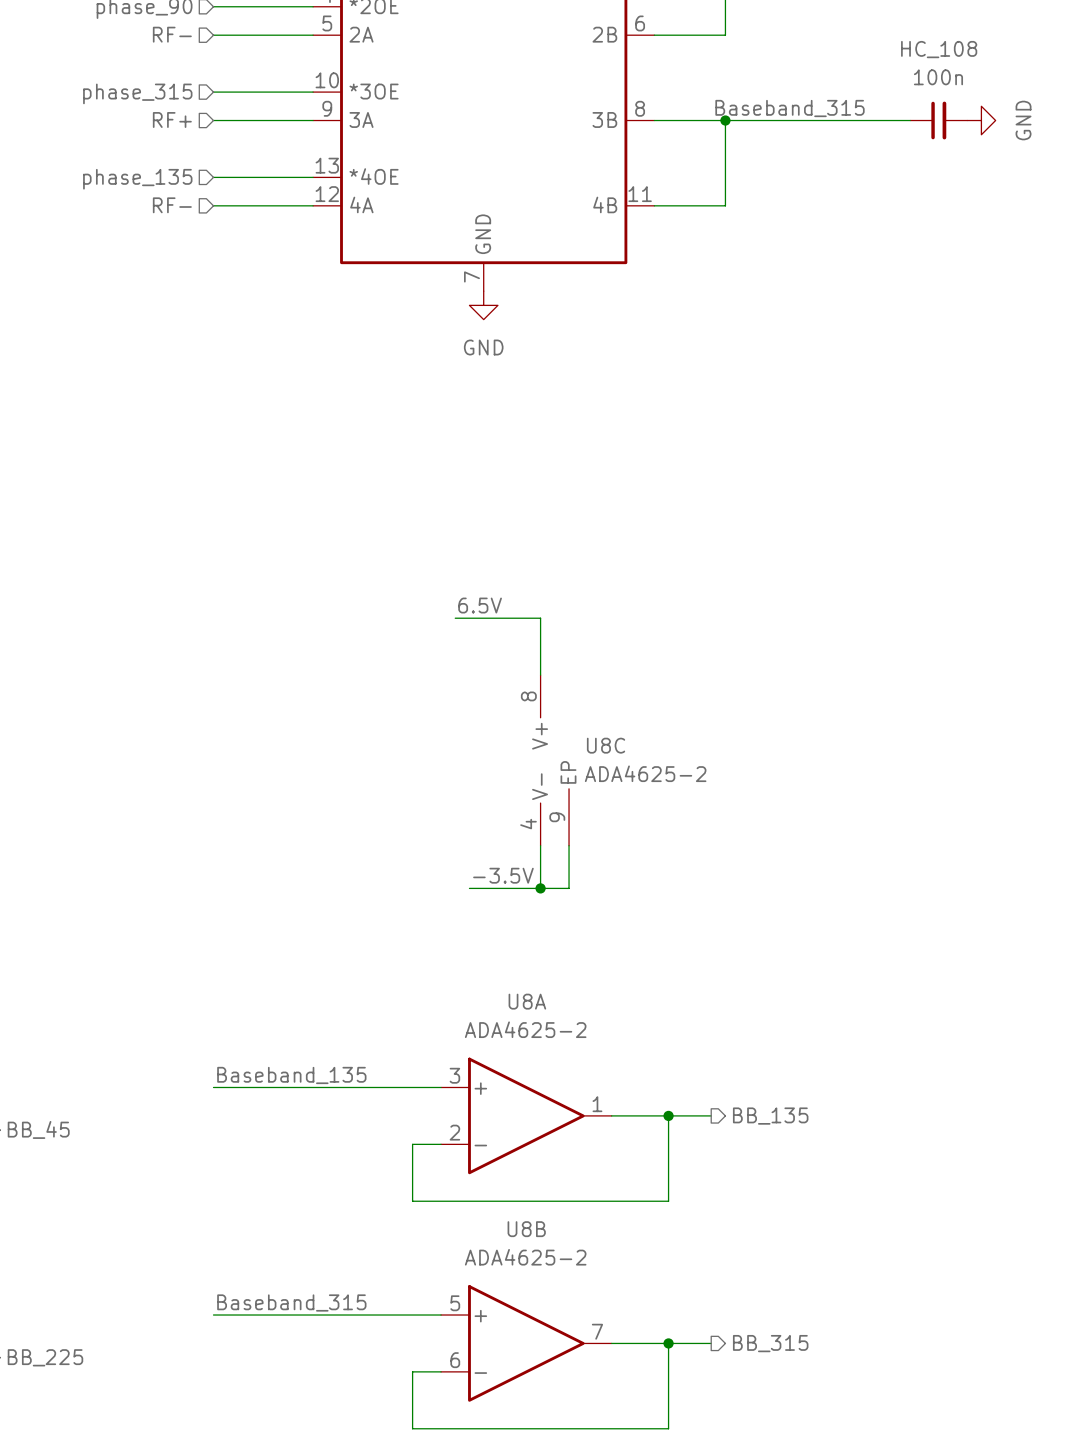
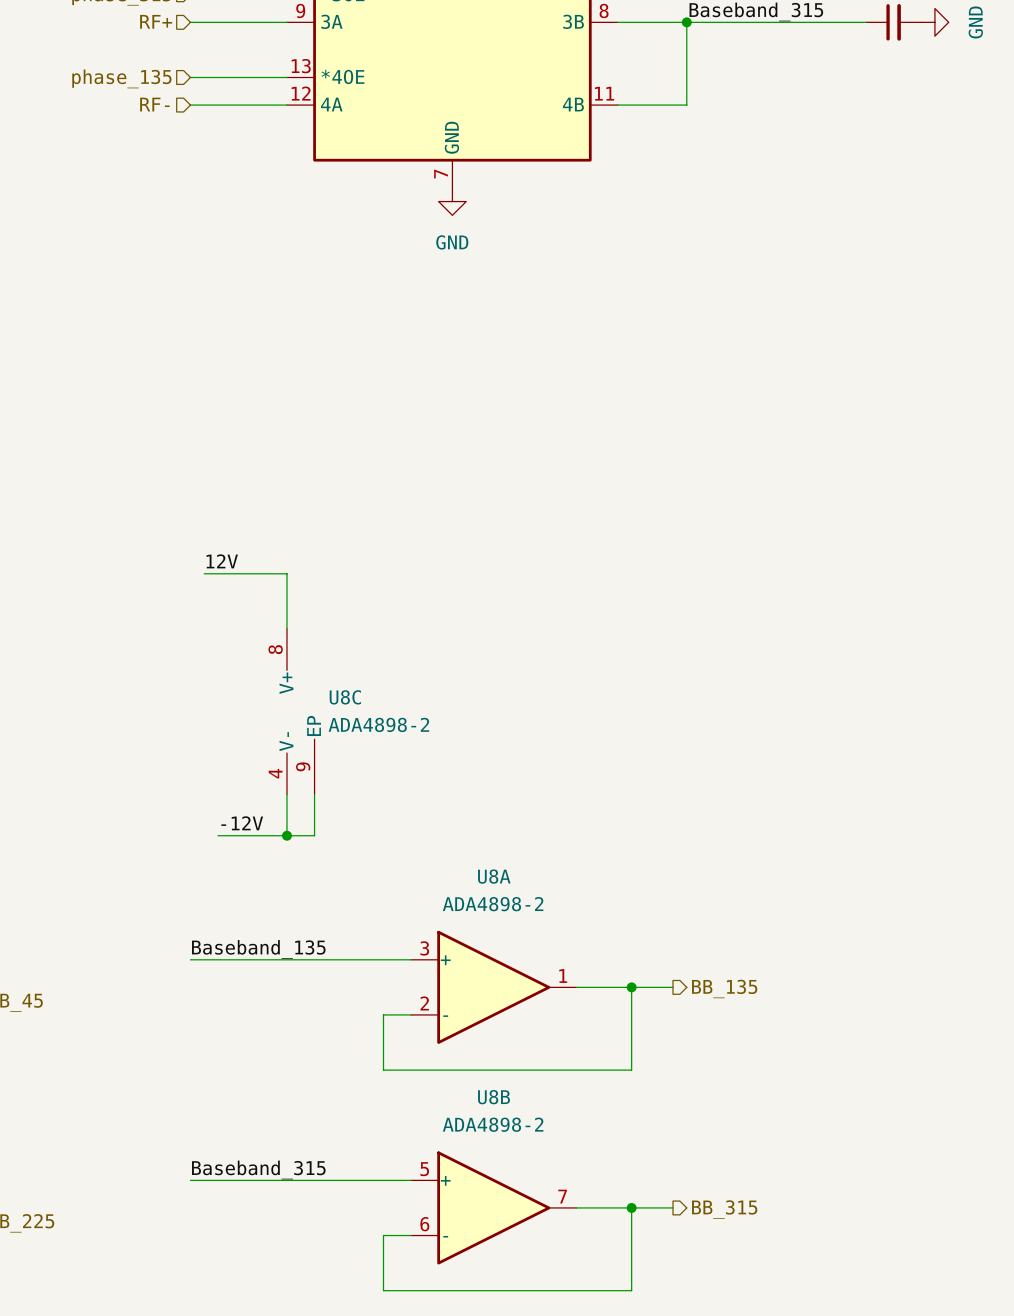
label: 6.5V (480, 605) -> none
wire: (455, 618) (540, 618) (540, 675) -> (204, 573) (286, 573) (286, 628)
label: none -> 12V (222, 561)
U8C position: (554, 760) -> (300, 711)
U8C value: ADA4625-2 (645, 773) -> ADA4898-2 (378, 724)
wire: (540, 845) (540, 888) -> (286, 794) (286, 835)
wire: (569, 845) (569, 888) (469, 888) -> (314, 794) (314, 835) (218, 835)
label: -3.5V (503, 875) -> none
junction: (540, 888) -> none
label: none -> -12V (242, 823)
junction: none -> (286, 835)
U8A value: ADA4625-2 (525, 1029) -> ADA4898-2 (493, 904)
U8B value: ADA4625-2 (525, 1257) -> ADA4898-2 (493, 1124)

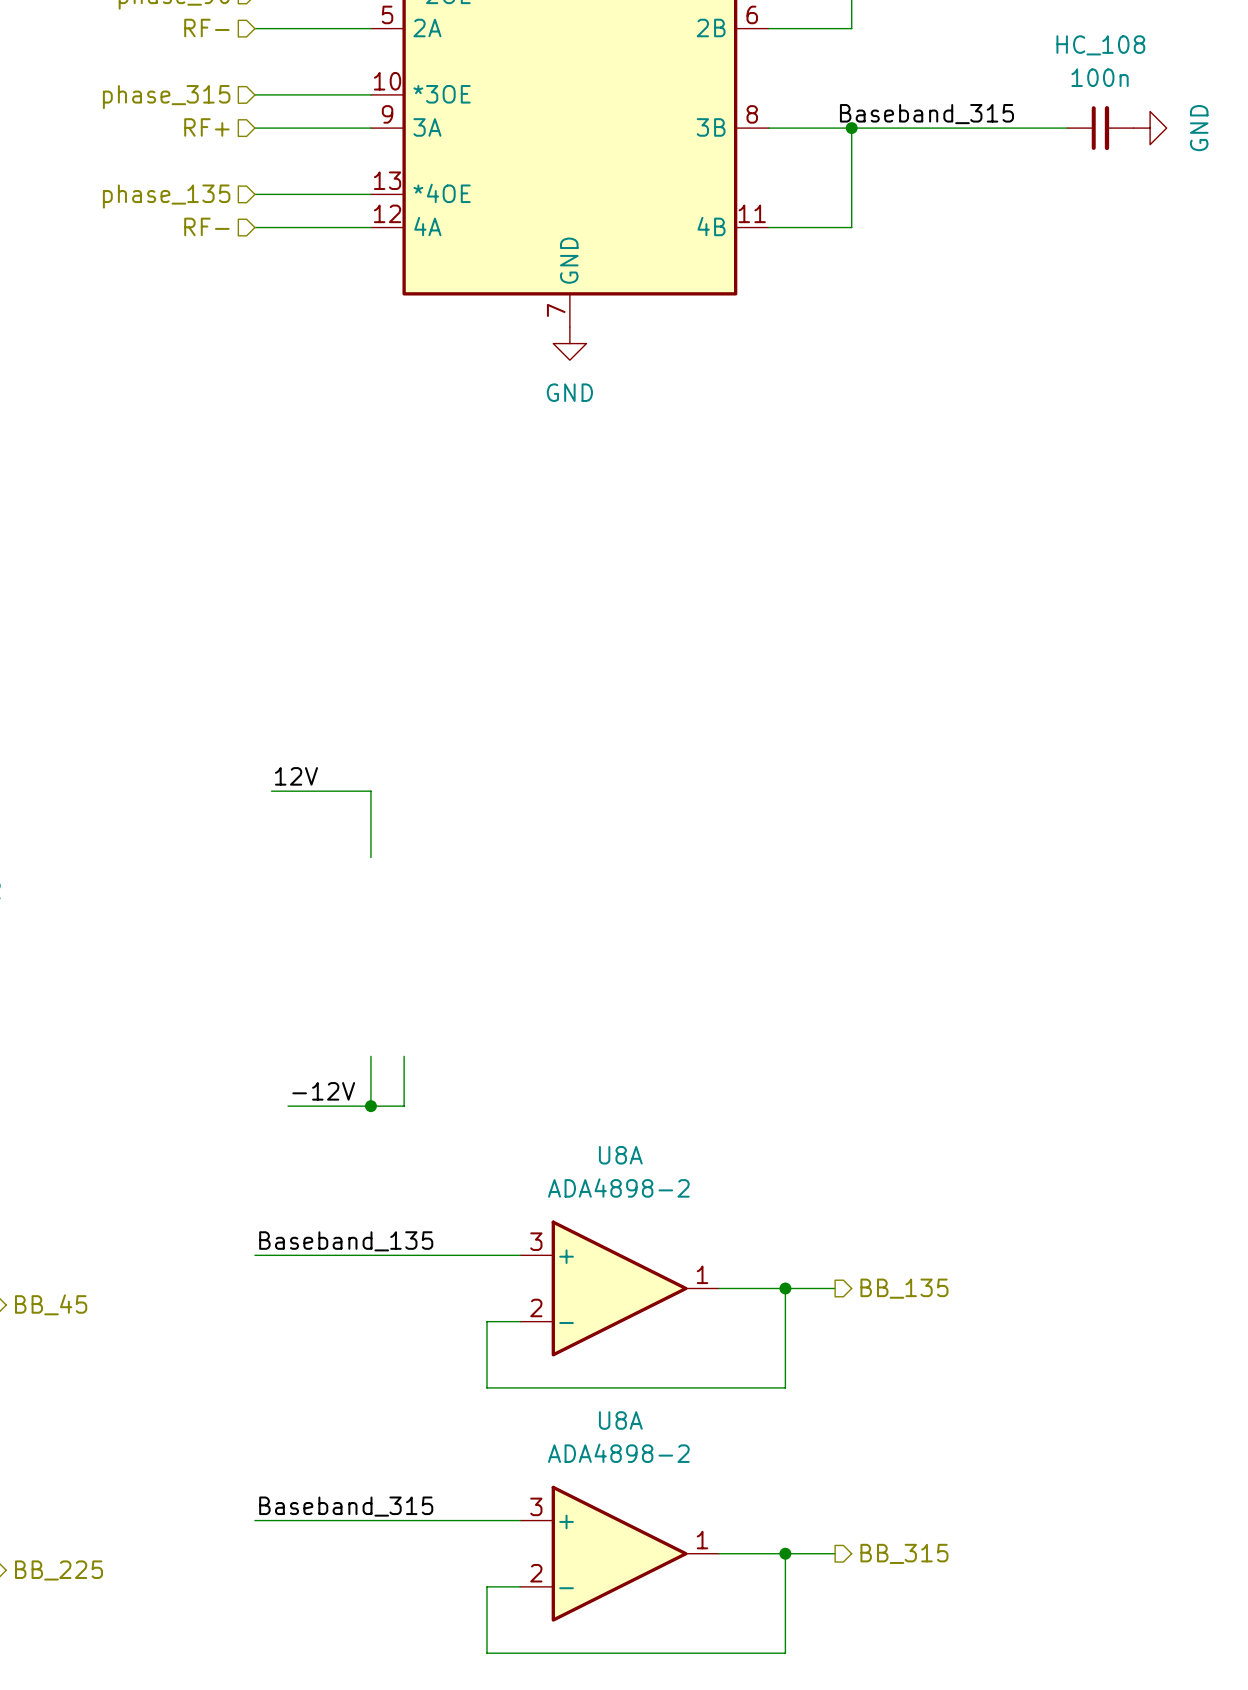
U8C: ADA4898-2 (300, 711) -> none
U8B name: U8B (494, 1097) -> U8A (620, 1420)
U8B pin number: 5 (424, 1169) -> 3 (536, 1506)
U8B pin number: 7 (562, 1196) -> 1 (702, 1540)
U8B pin number: 6 (424, 1224) -> 2 (536, 1573)

